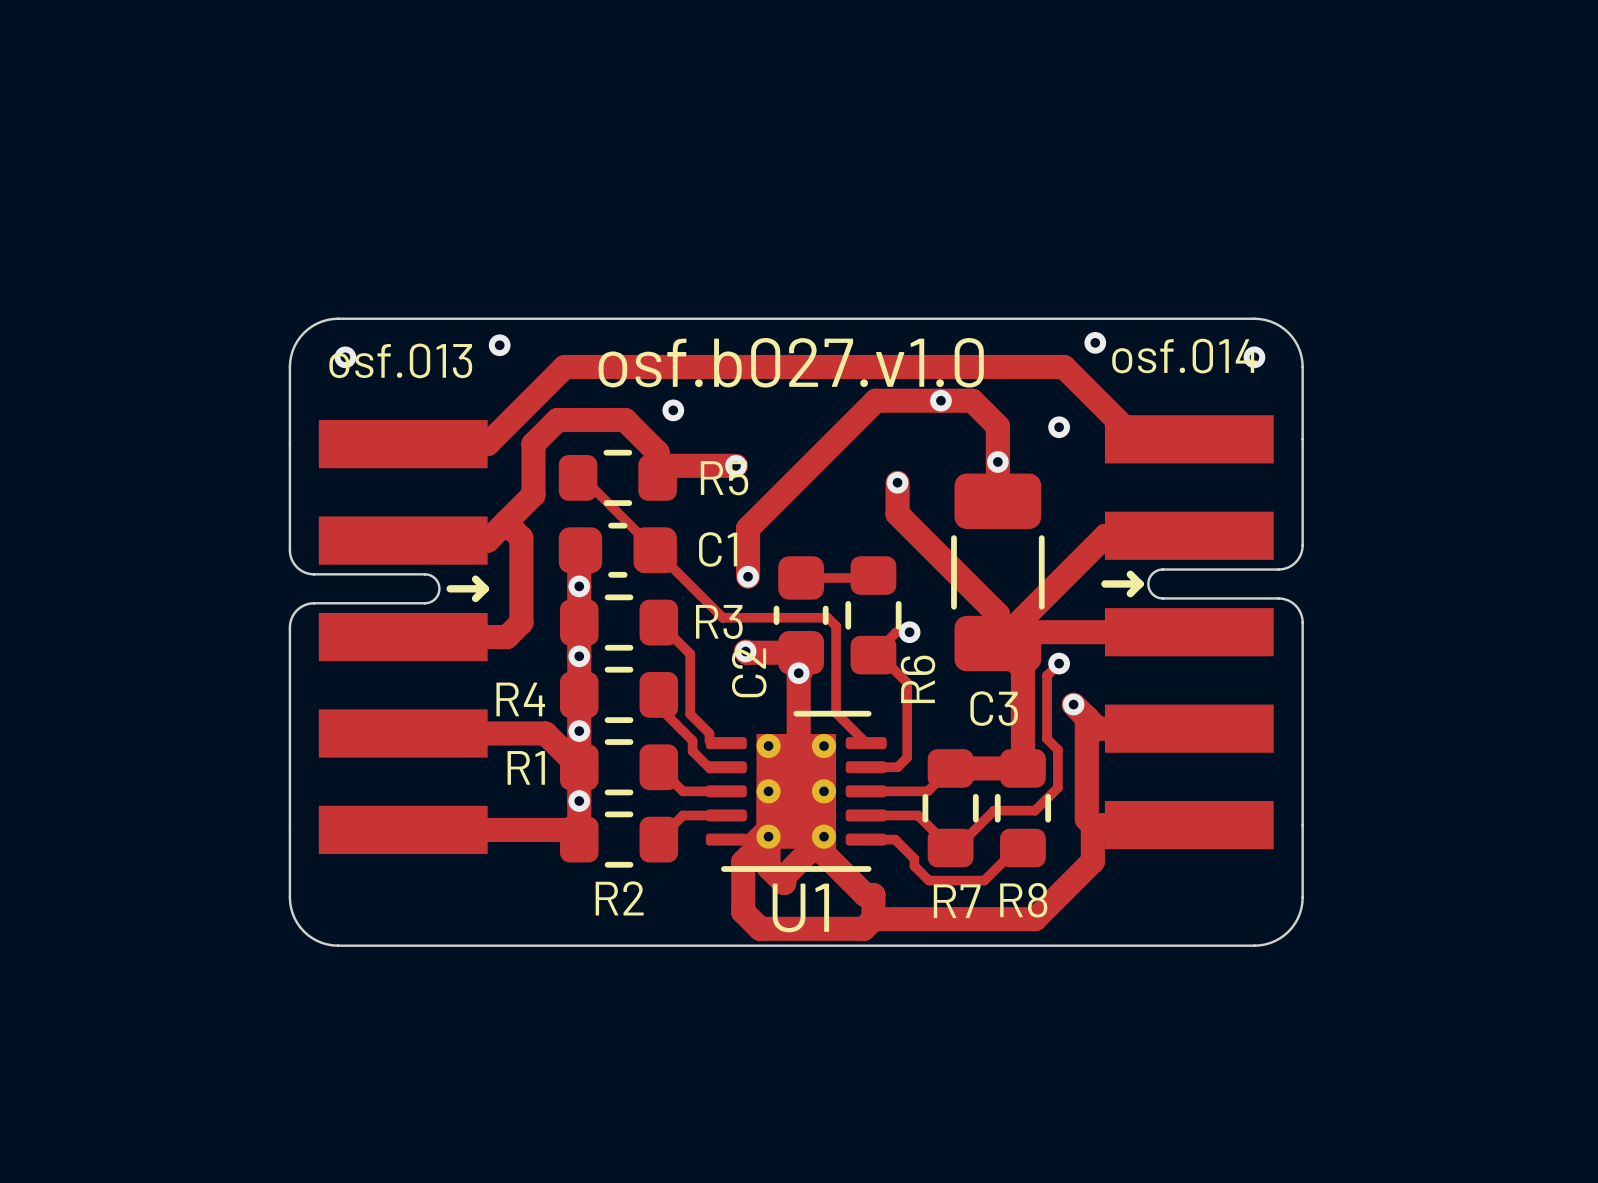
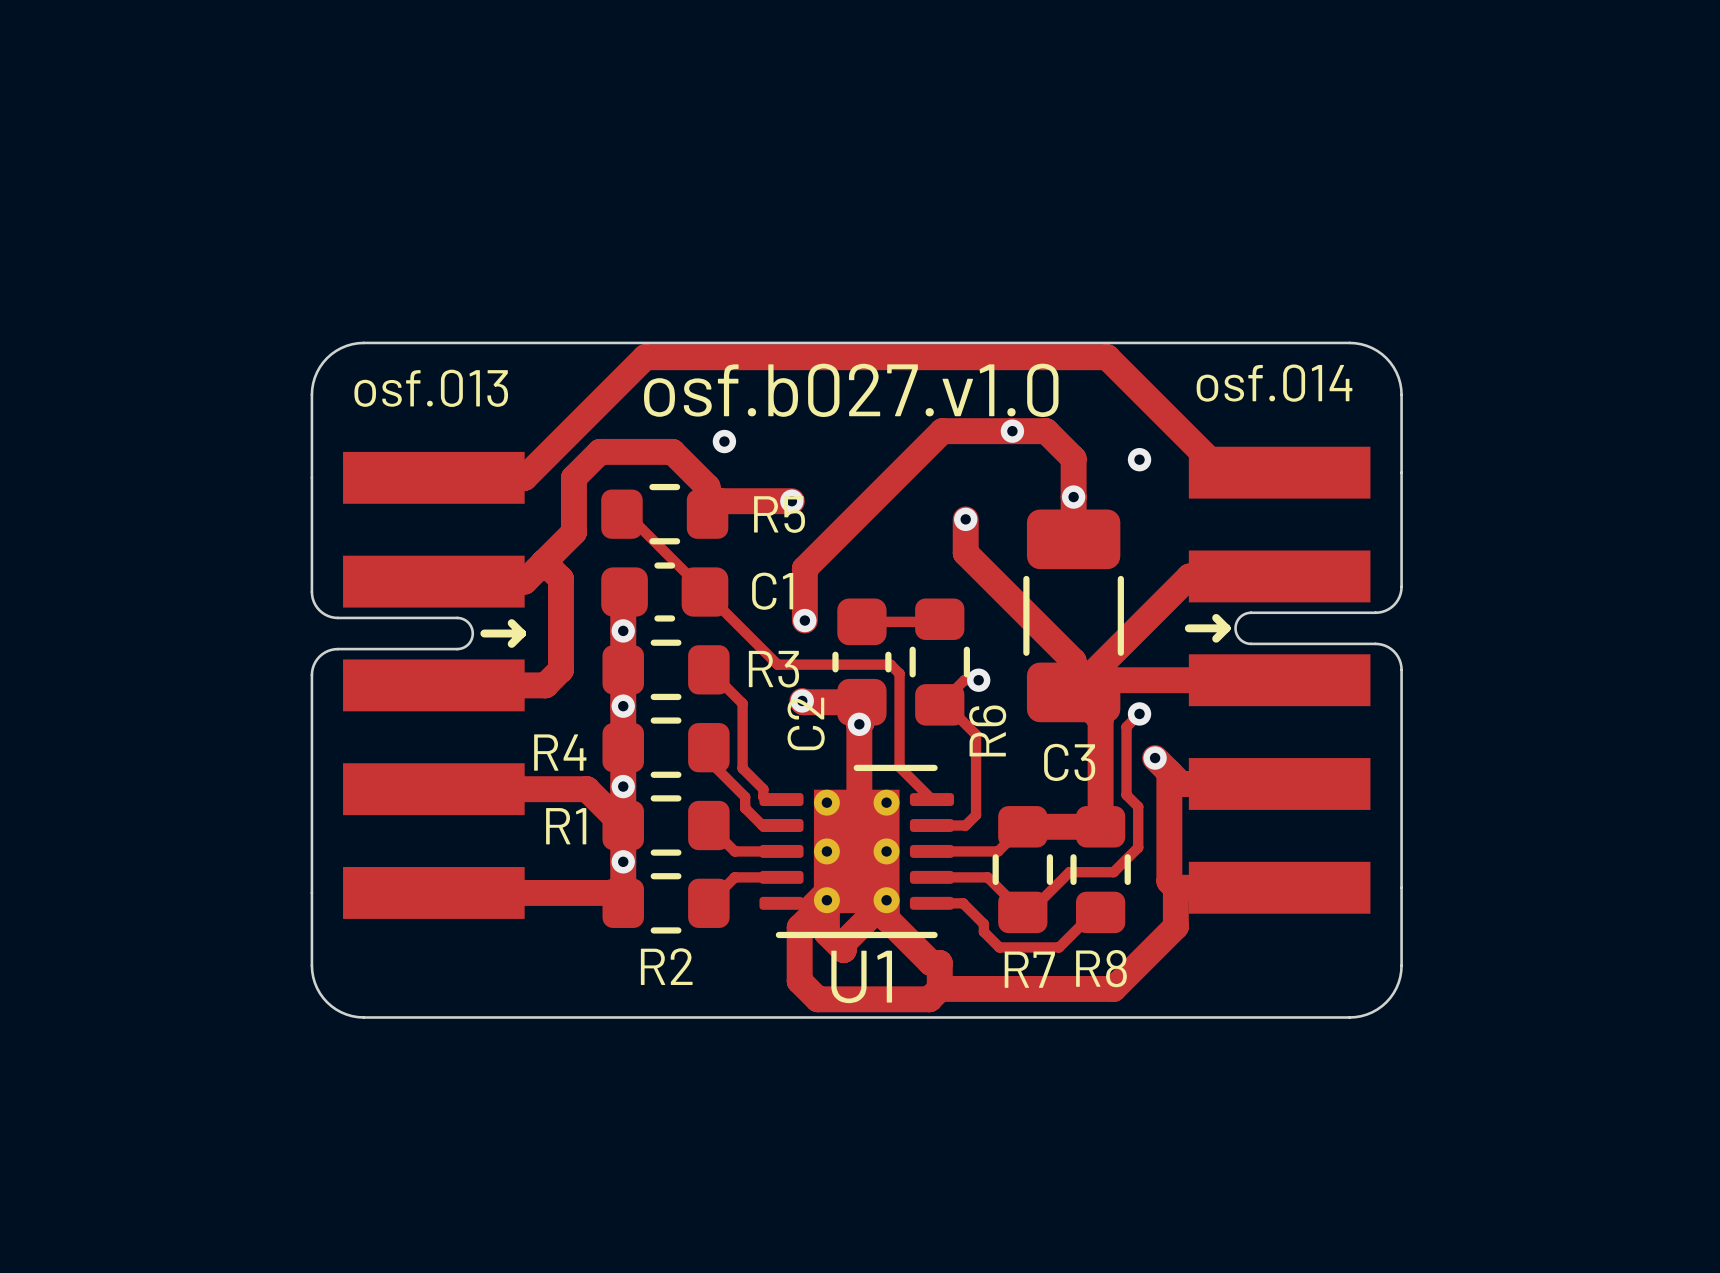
via: (1095, 342) -> none
via: (499, 345) -> none
via: (345, 357) -> none
via: (1254, 357) -> none
track: (564, 366) (1063, 366) -> (607, 394) (645, 357) (1107, 357) (1144, 394)

